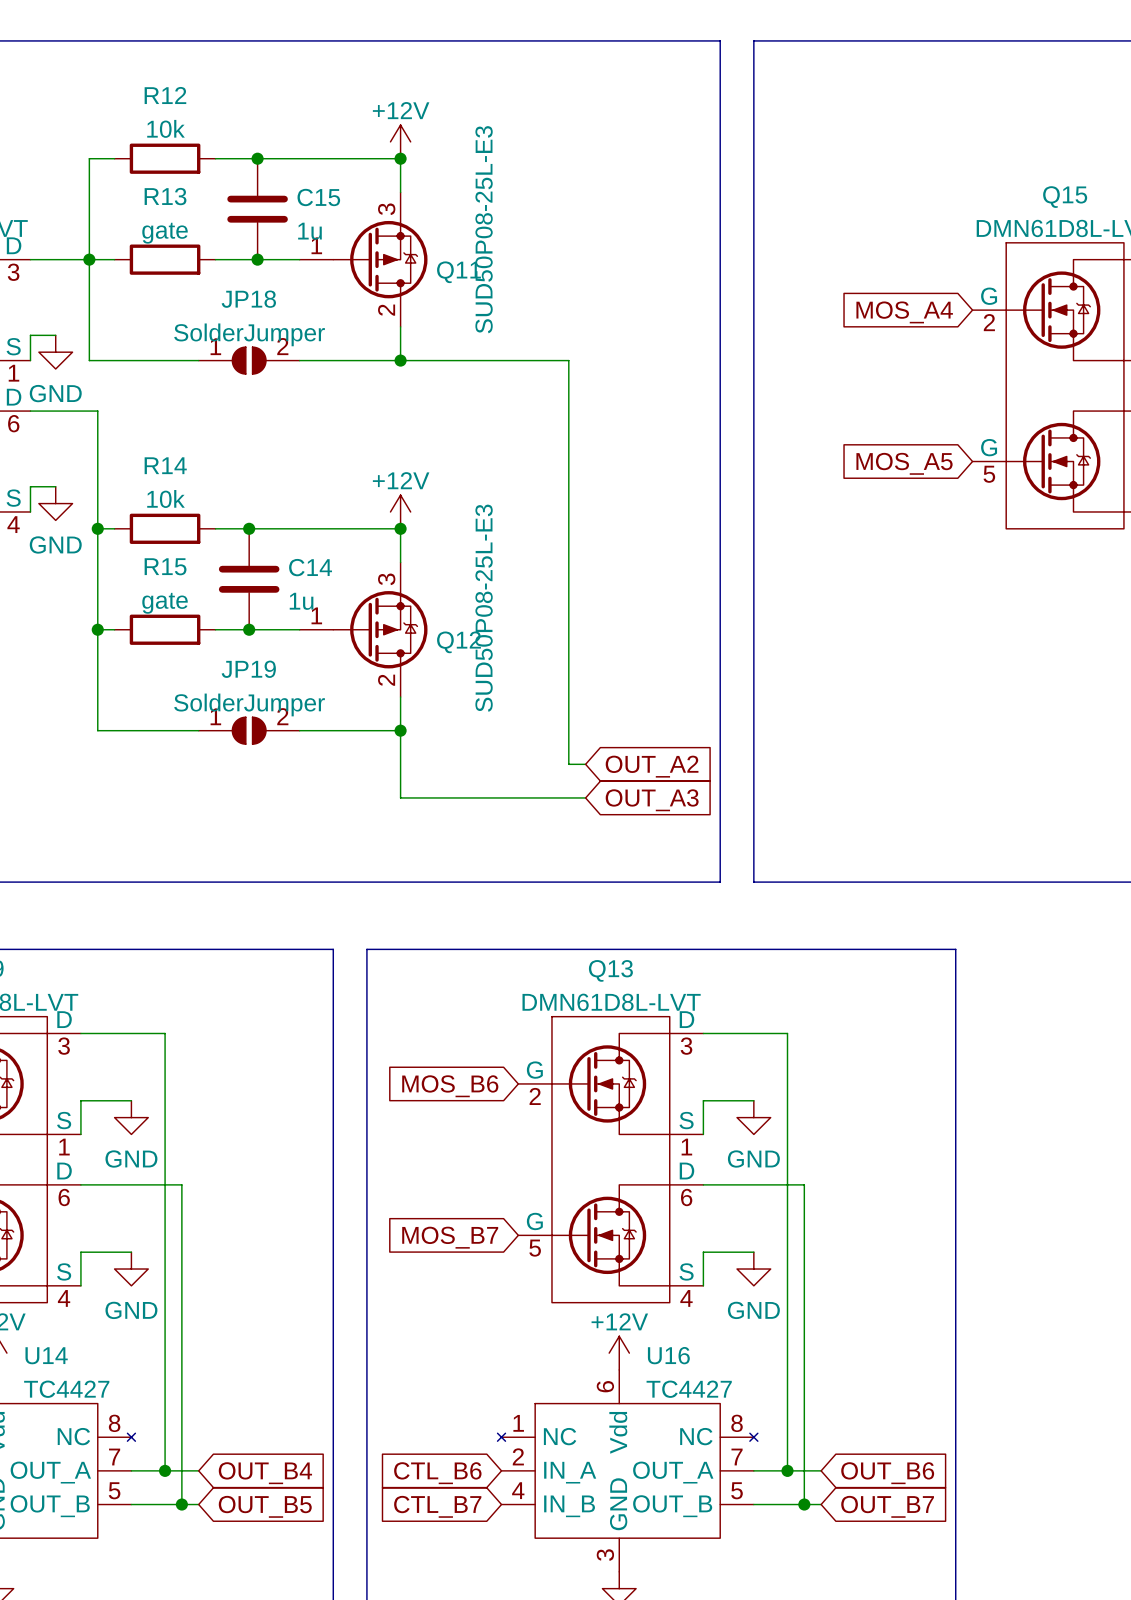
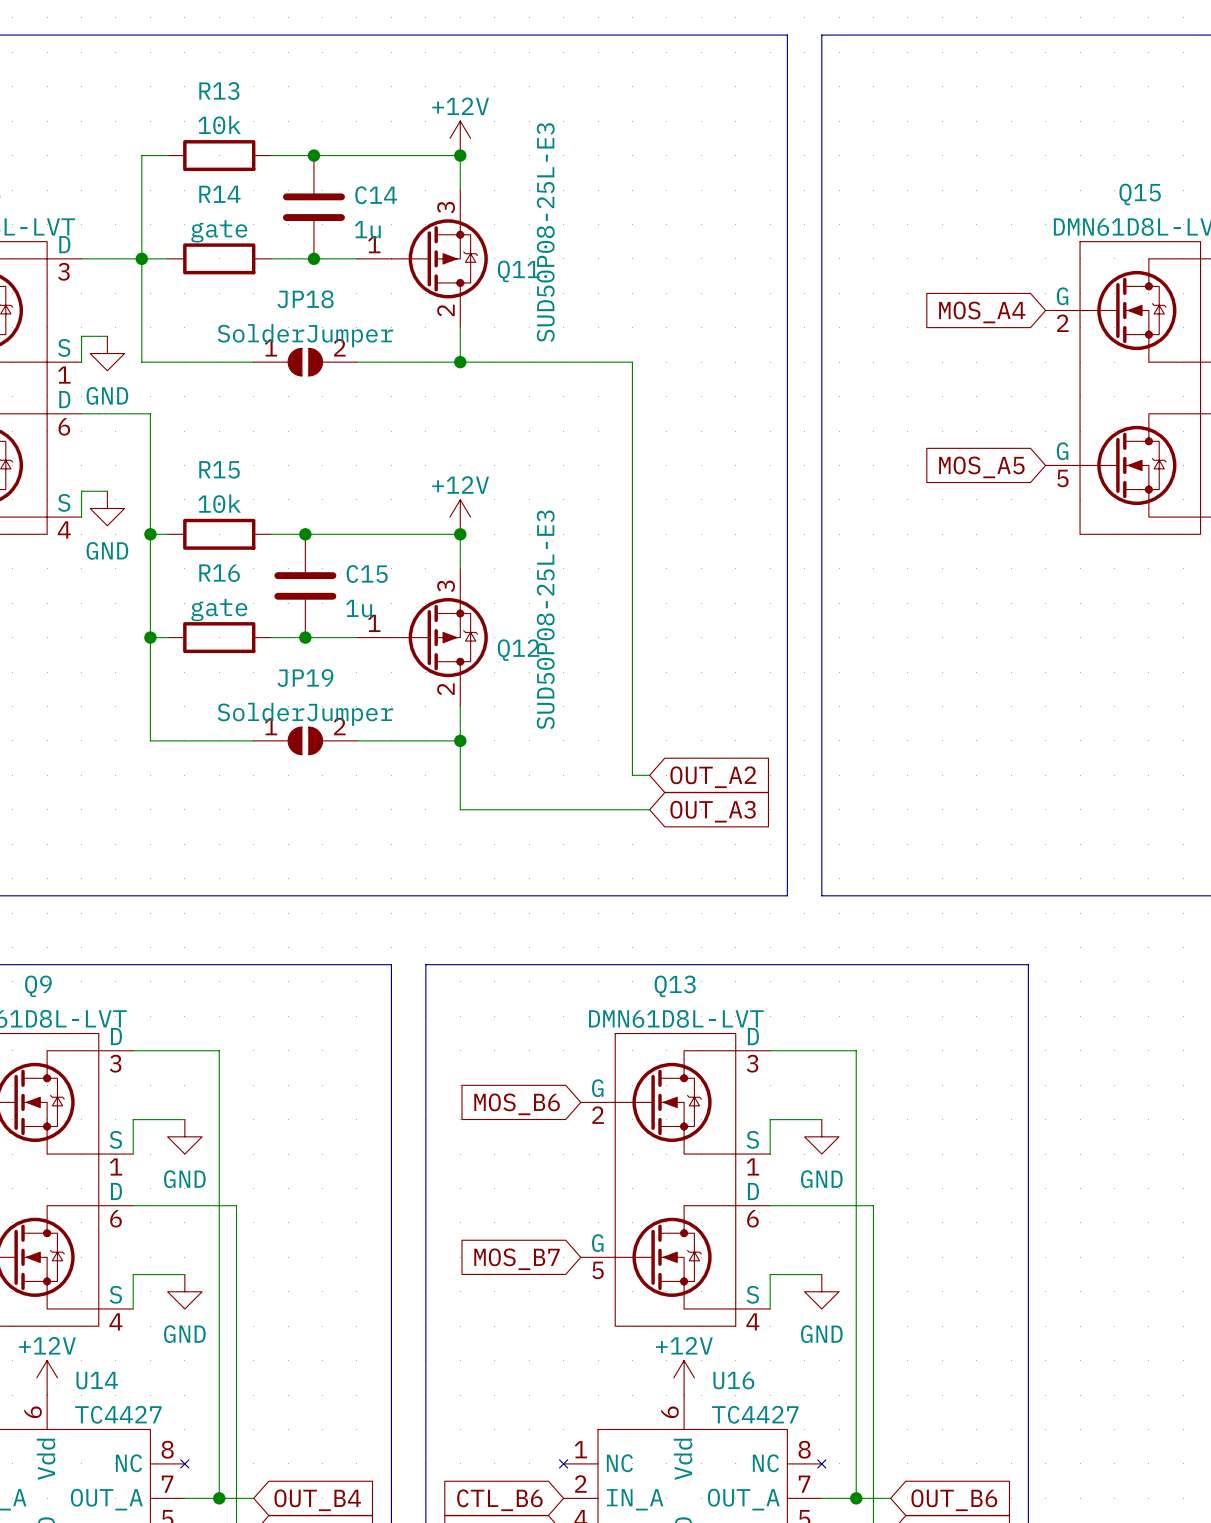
R12 name: R12 (165, 95) -> R13 (219, 91)
R13 name: R13 (165, 196) -> R14 (219, 194)
C15 name: C15 (318, 197) -> C14 (376, 195)
R14 name: R14 (165, 465) -> R15 (219, 469)
R15 name: R15 (165, 566) -> R16 (219, 573)
C14 name: C14 (310, 567) -> C15 (367, 573)

